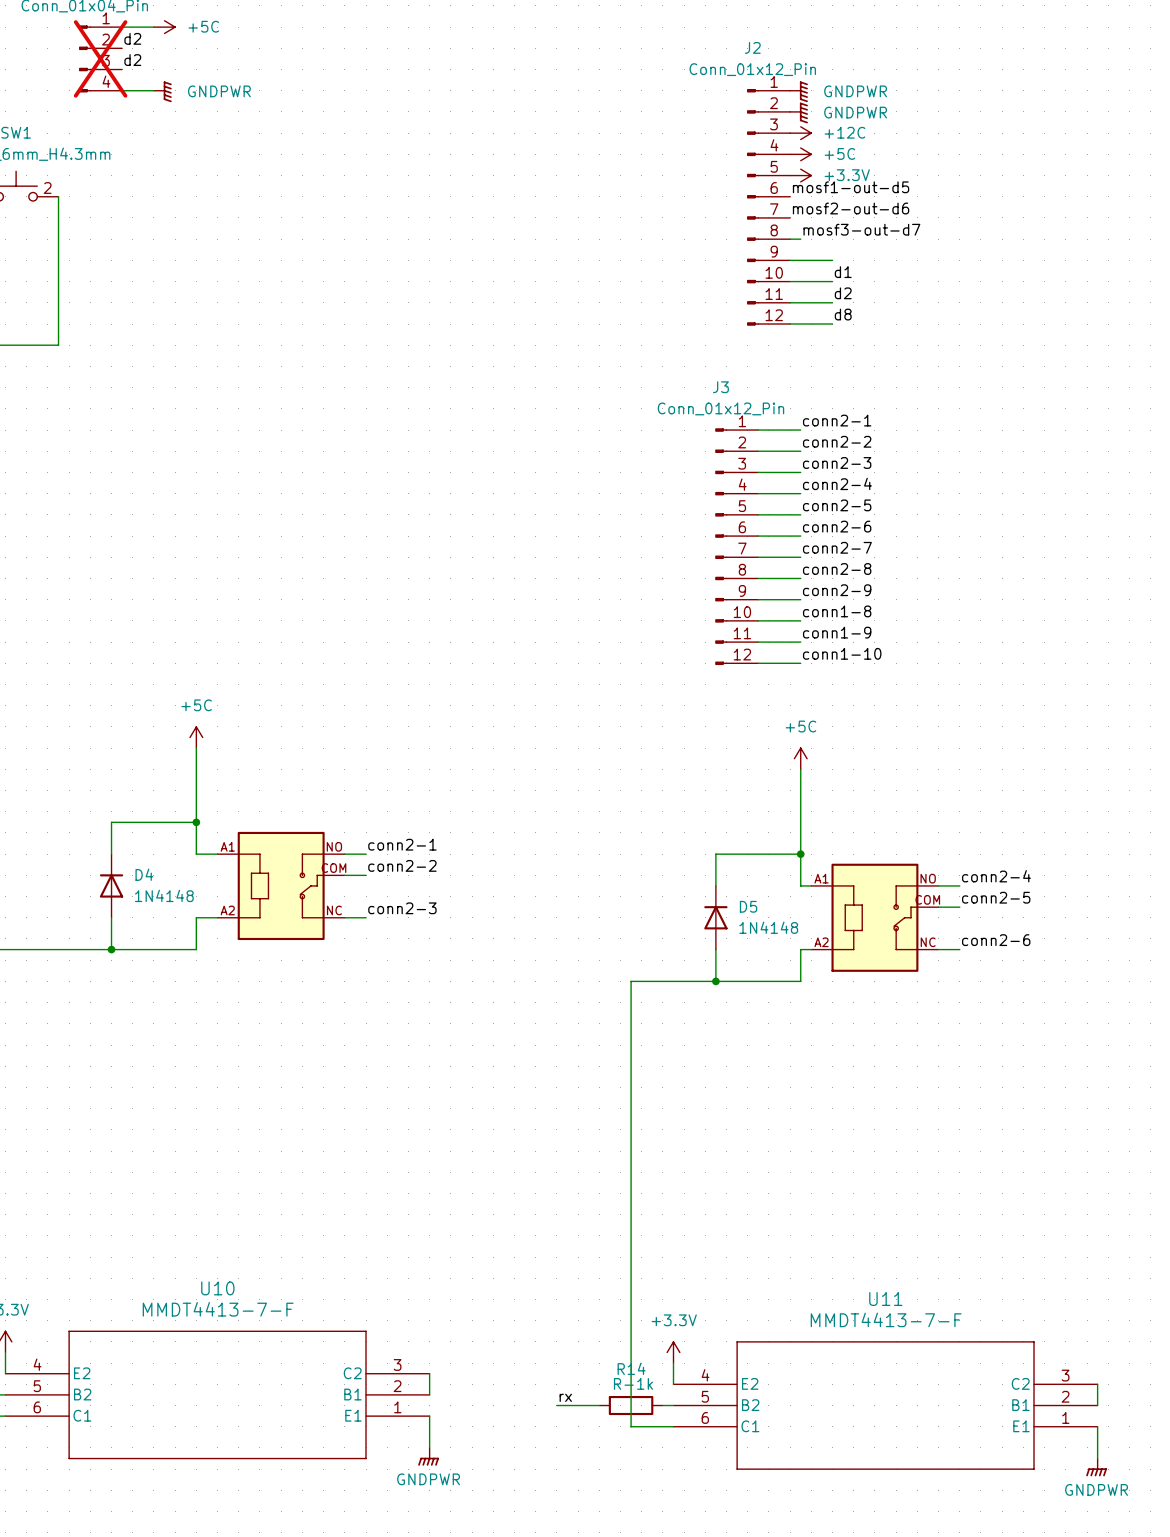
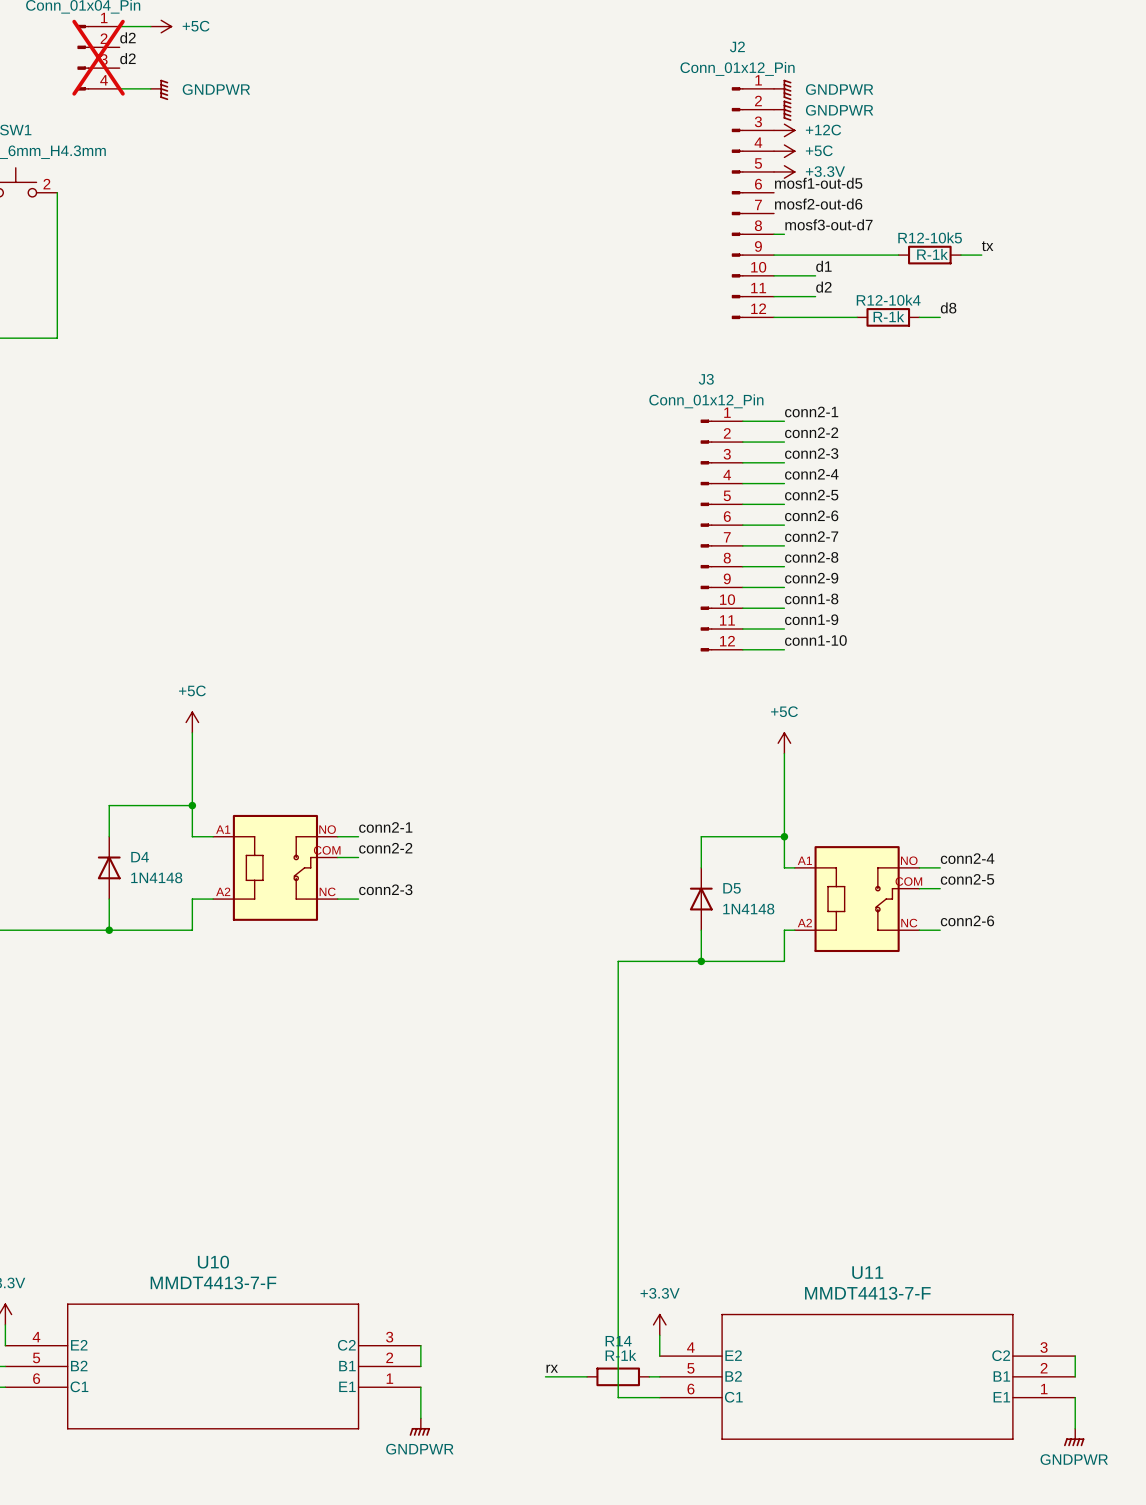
label: none -> tx (987, 246)
wire: none -> (815, 255) (898, 255)
R12-10k5: none -> R-1k (929, 255)
wire: none -> (960, 255) (981, 255)
label position: d8 (843, 314) -> d8 (948, 307)
wire: none -> (815, 317) (857, 317)
R12-10k4: none -> R-1k (888, 317)
wire: none -> (919, 317) (940, 317)

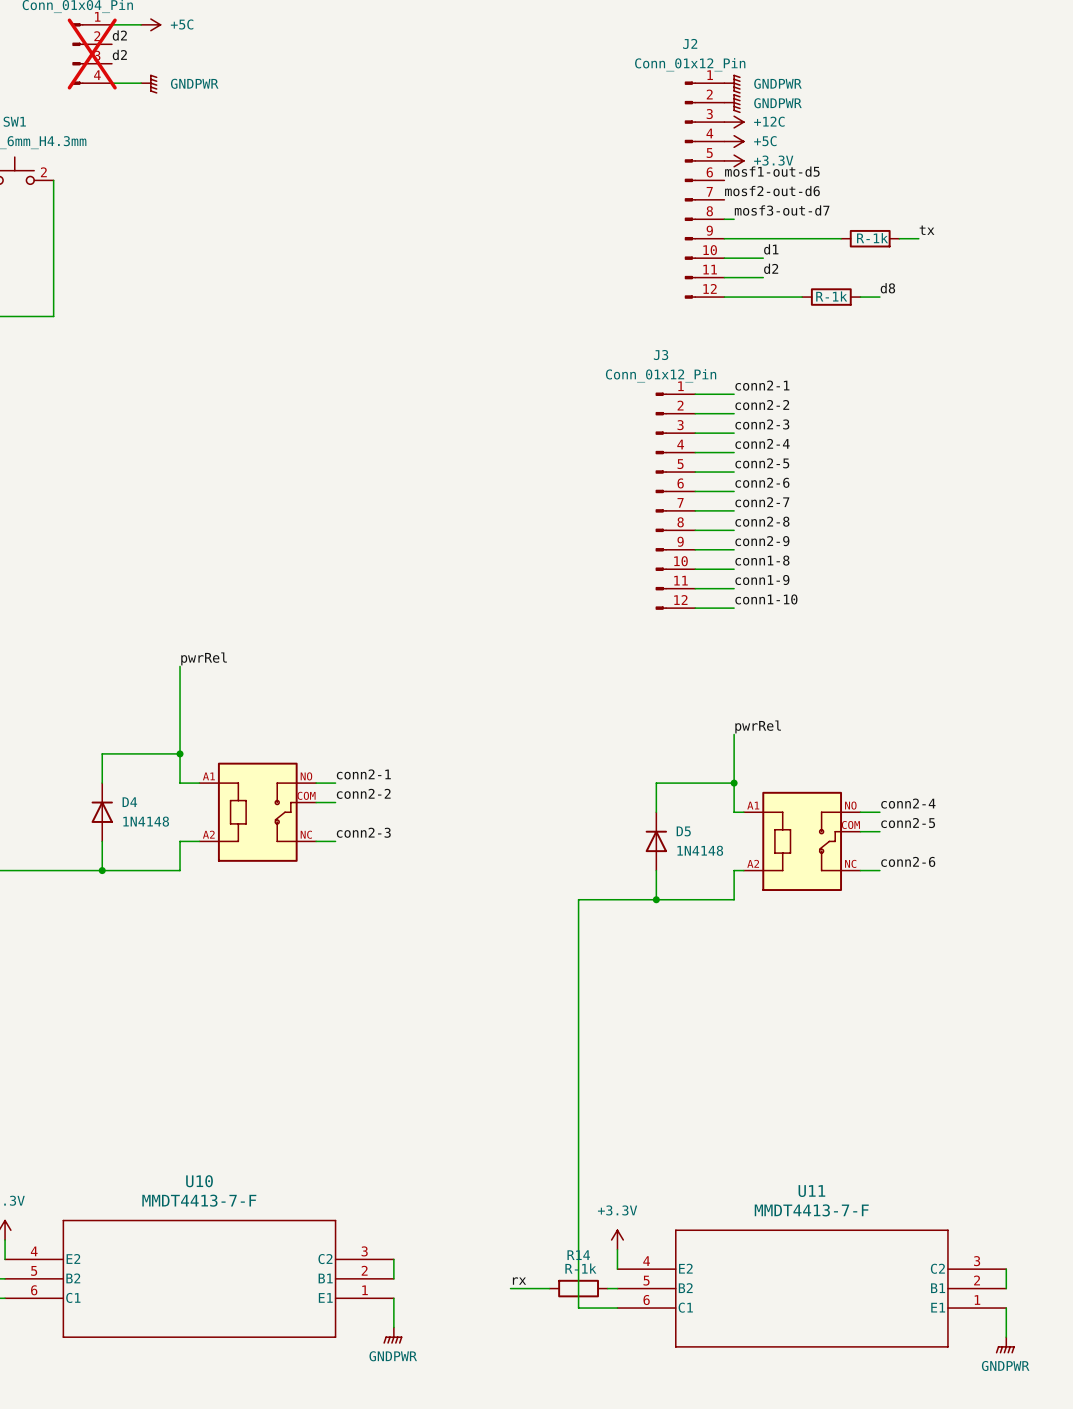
R12-10k5 name: R12-10k5 (930, 237) -> none
R12-10k4 name: R12-10k4 (888, 300) -> none
label: none -> pwrRel (204, 658)
power symbol: +5C (192, 722) -> none
power symbol: +5C (784, 743) -> none
wire: (784, 753) (784, 784) -> none
label: none -> pwrRel (758, 726)

